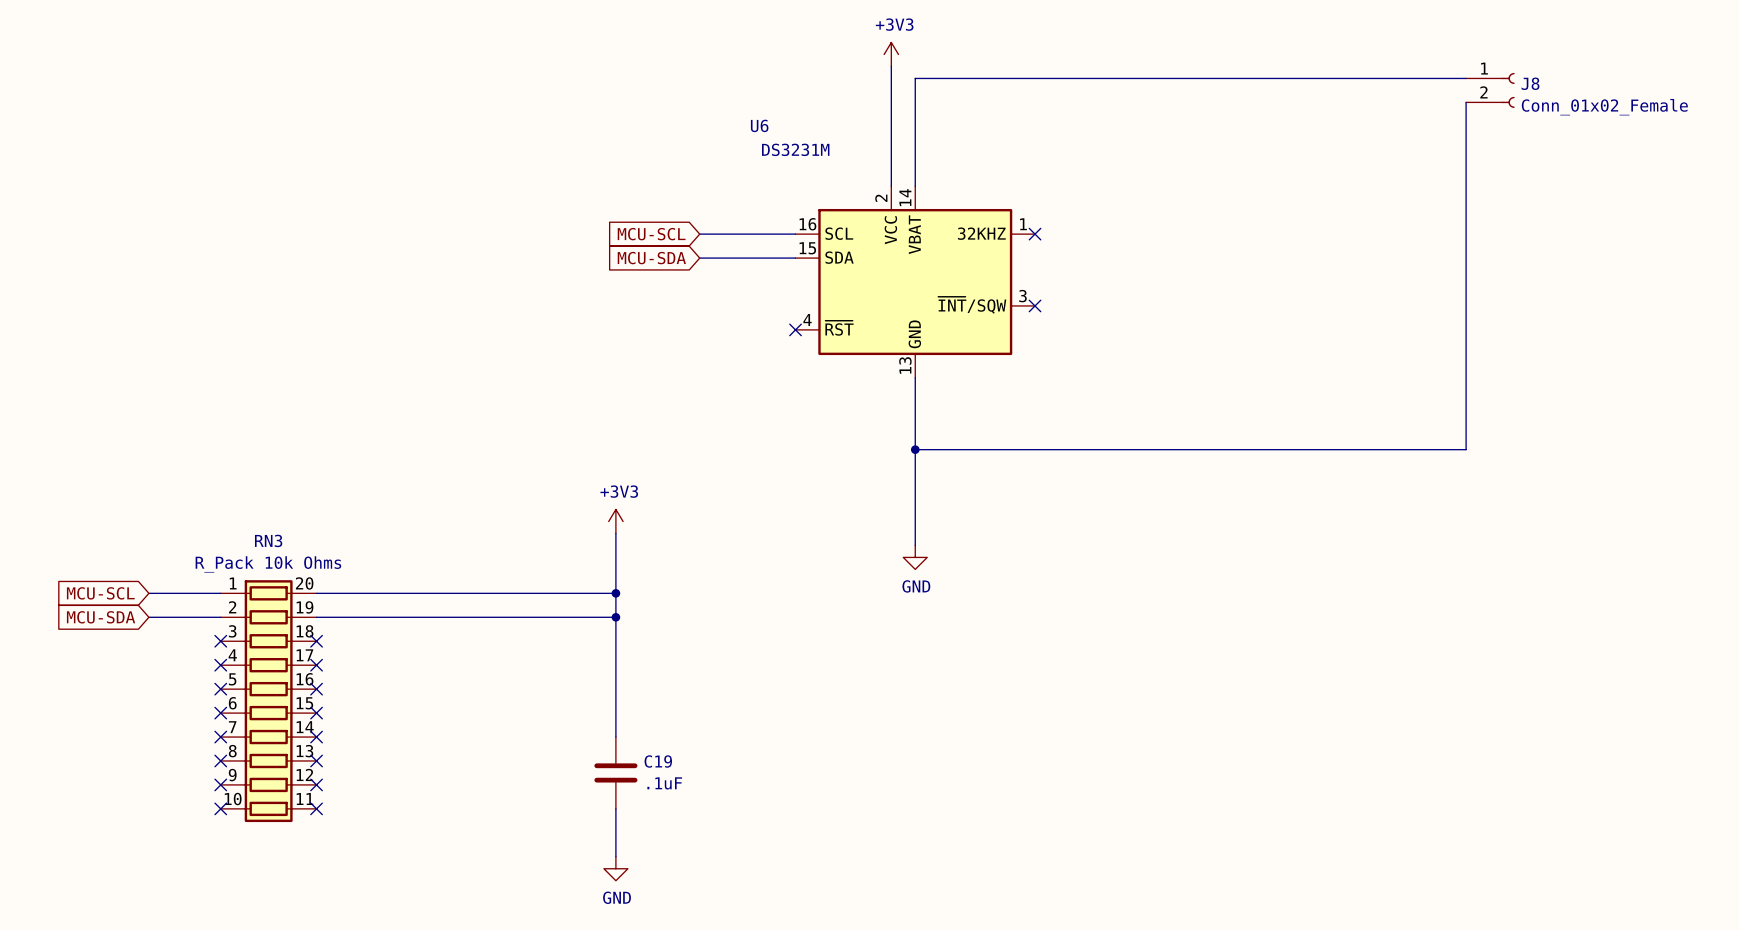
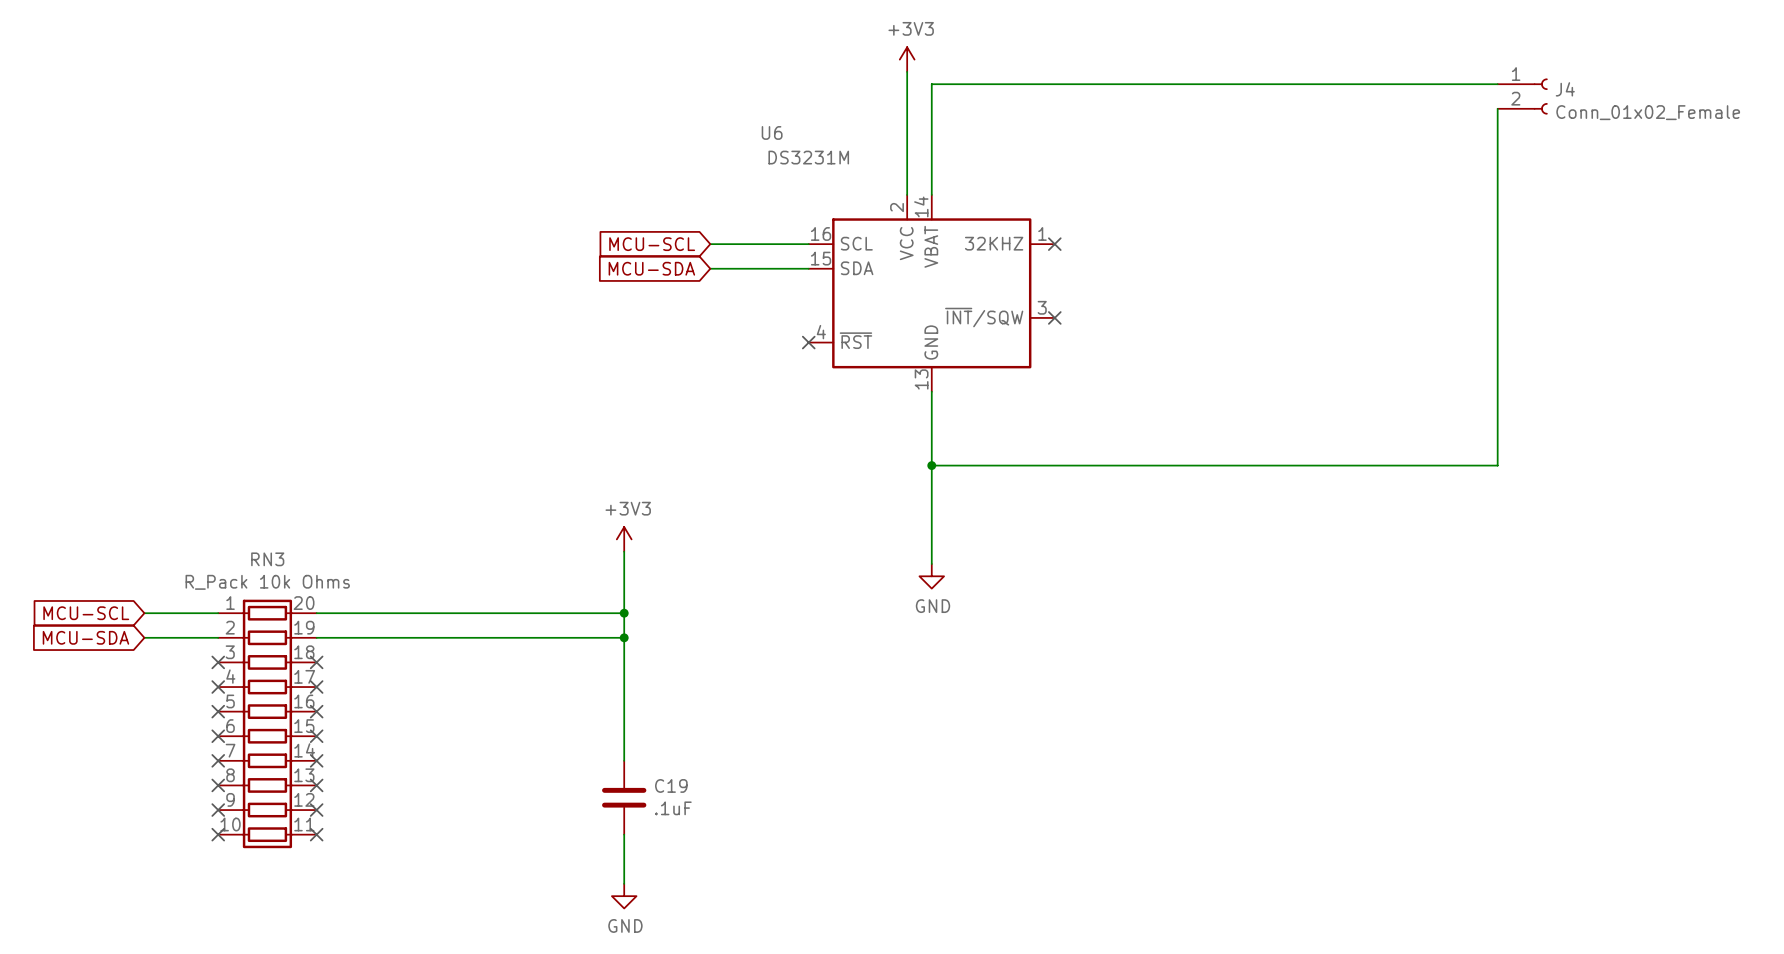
J8 name: J8 (1530, 83) -> J4 (1565, 89)

